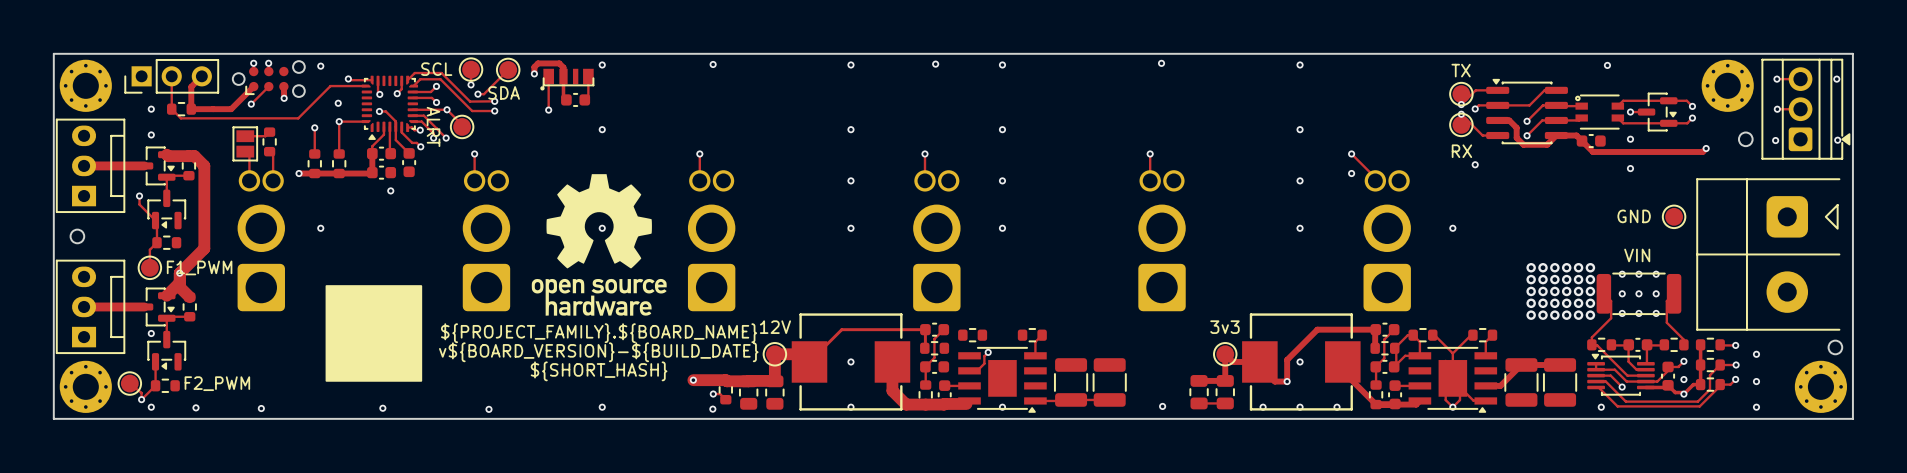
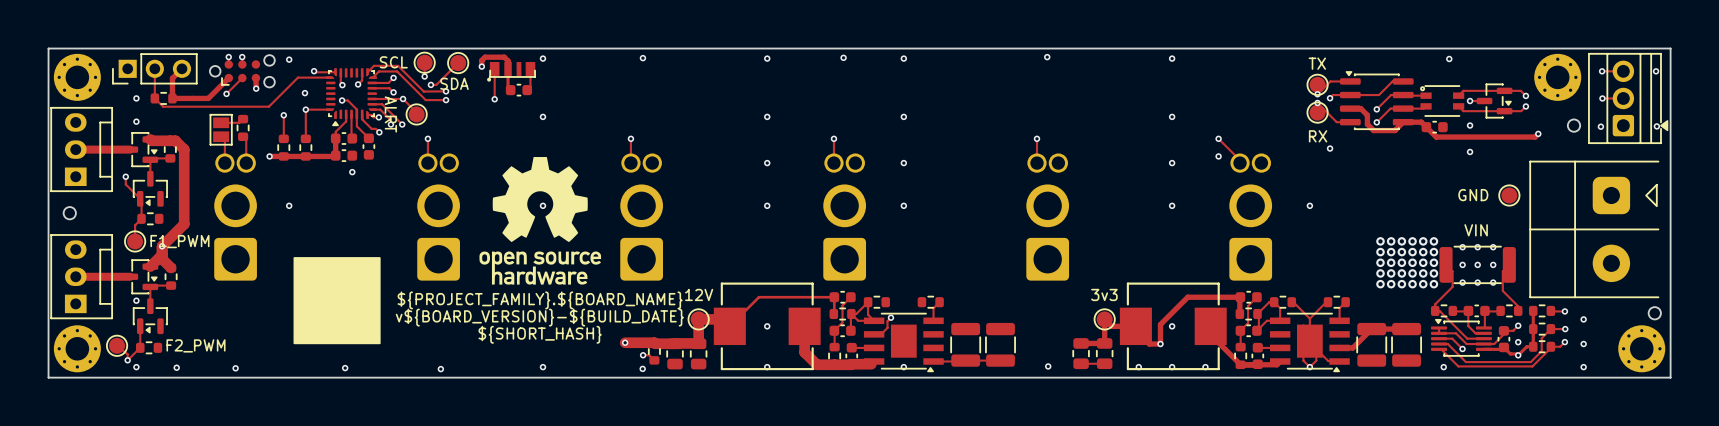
track: none -> (868, 302) (868, 314) (874, 320) (858, 320) (851, 314) (856, 314) (868, 302)
track: none -> (850, 314) (850, 330)

